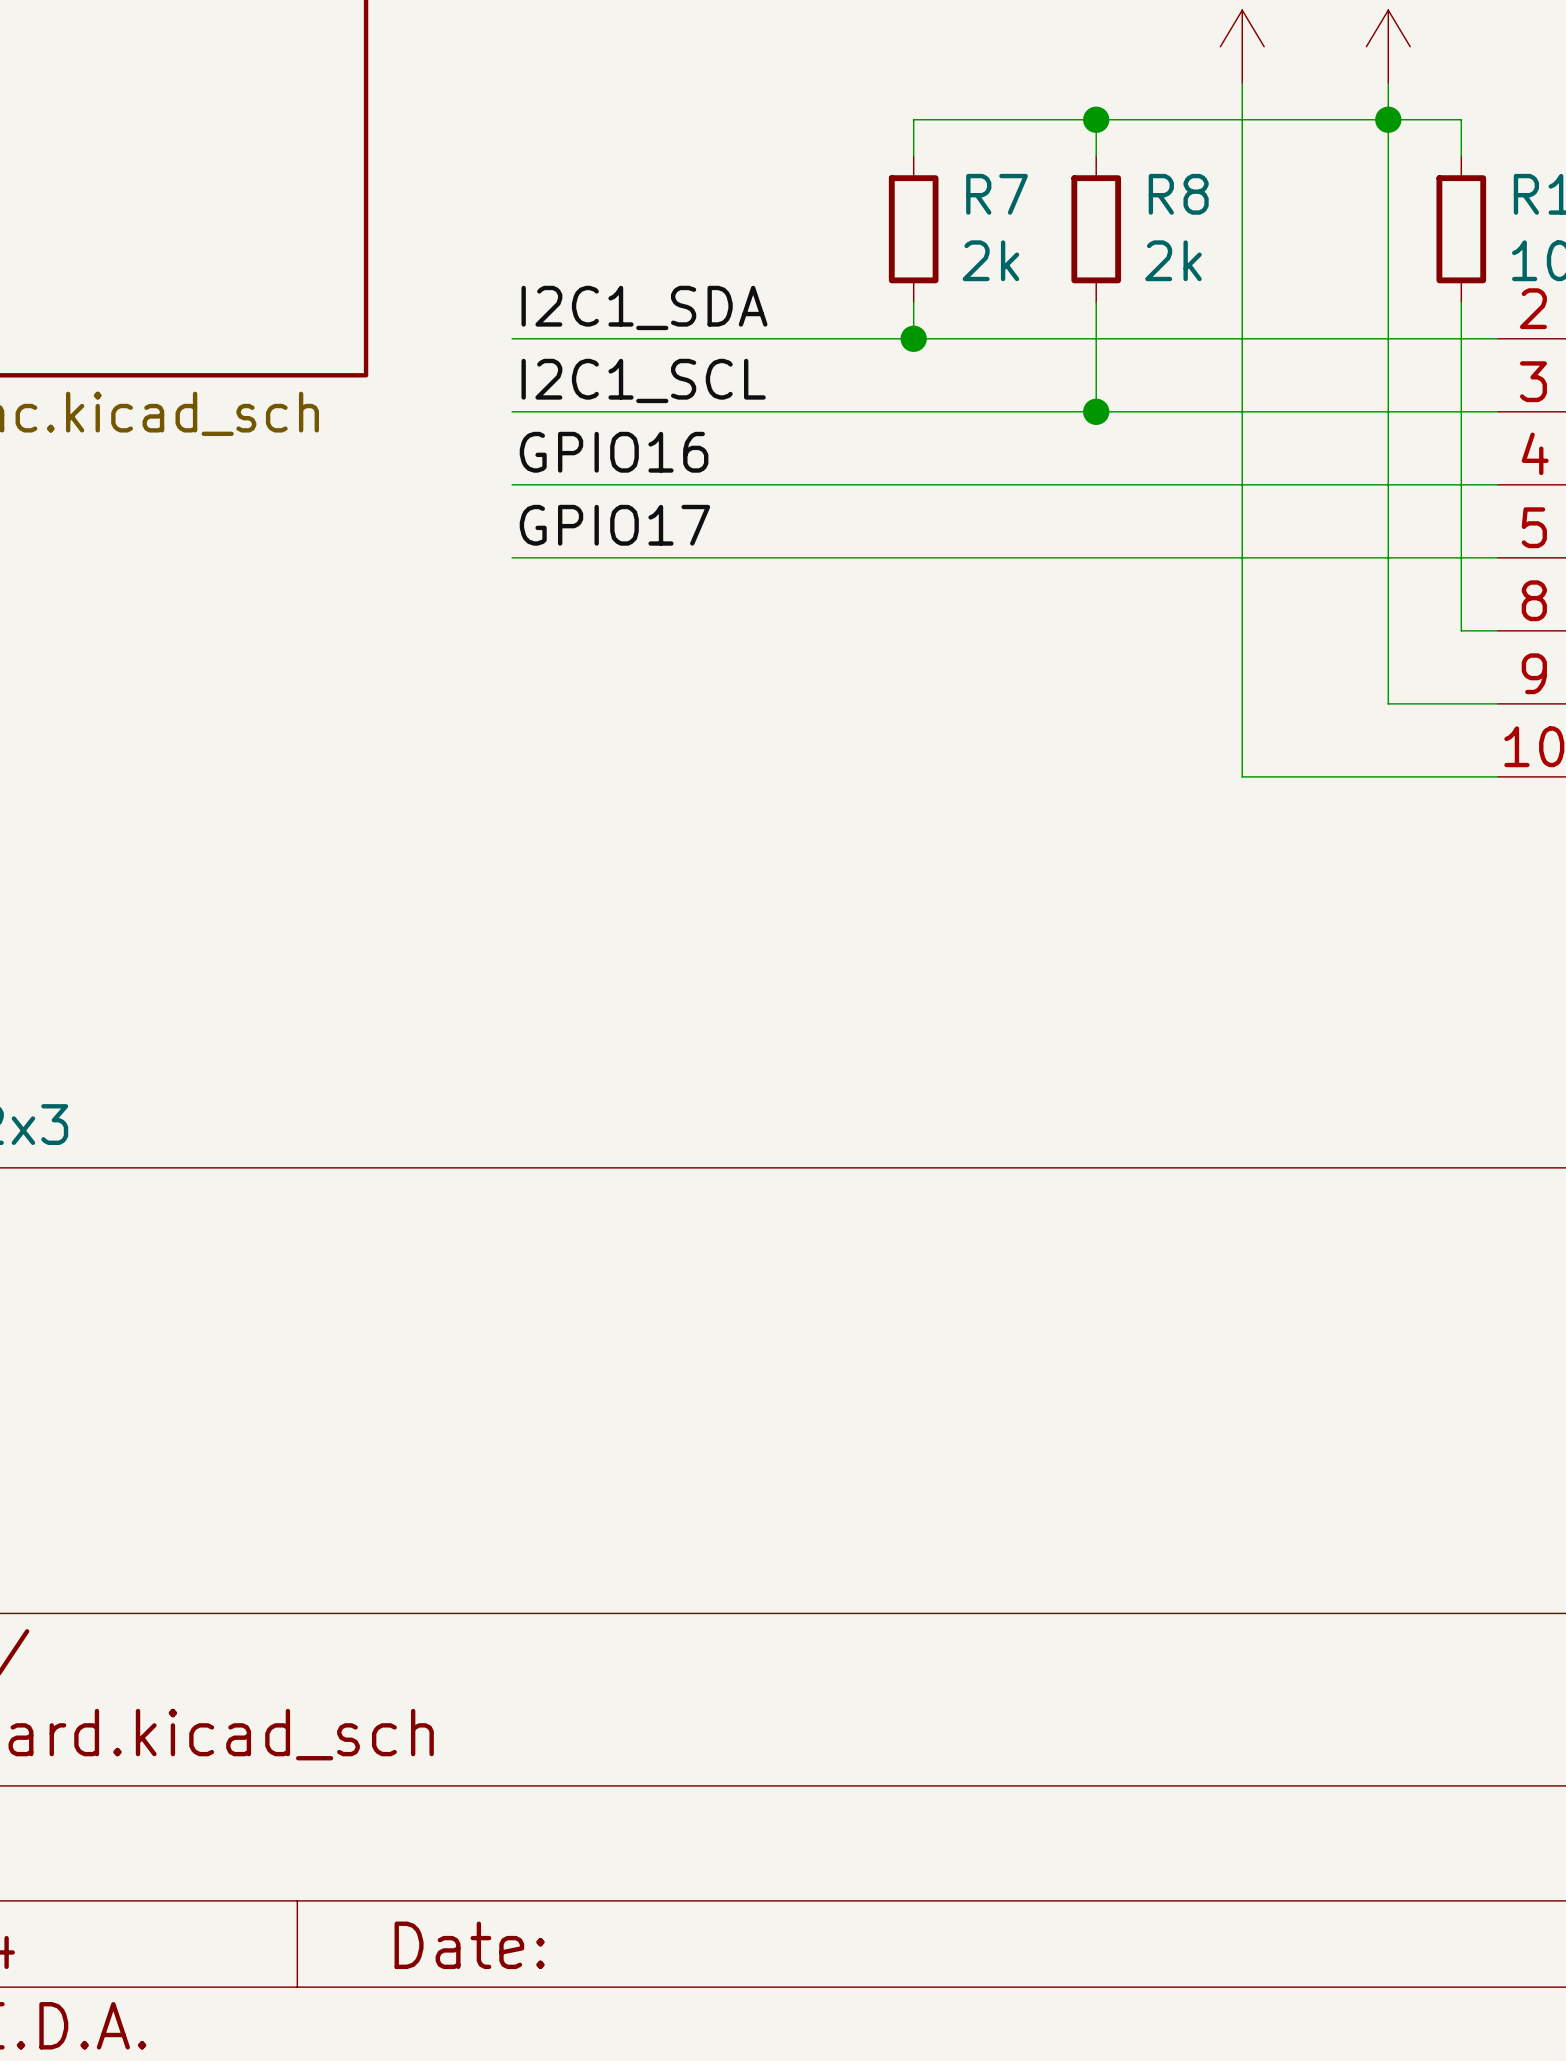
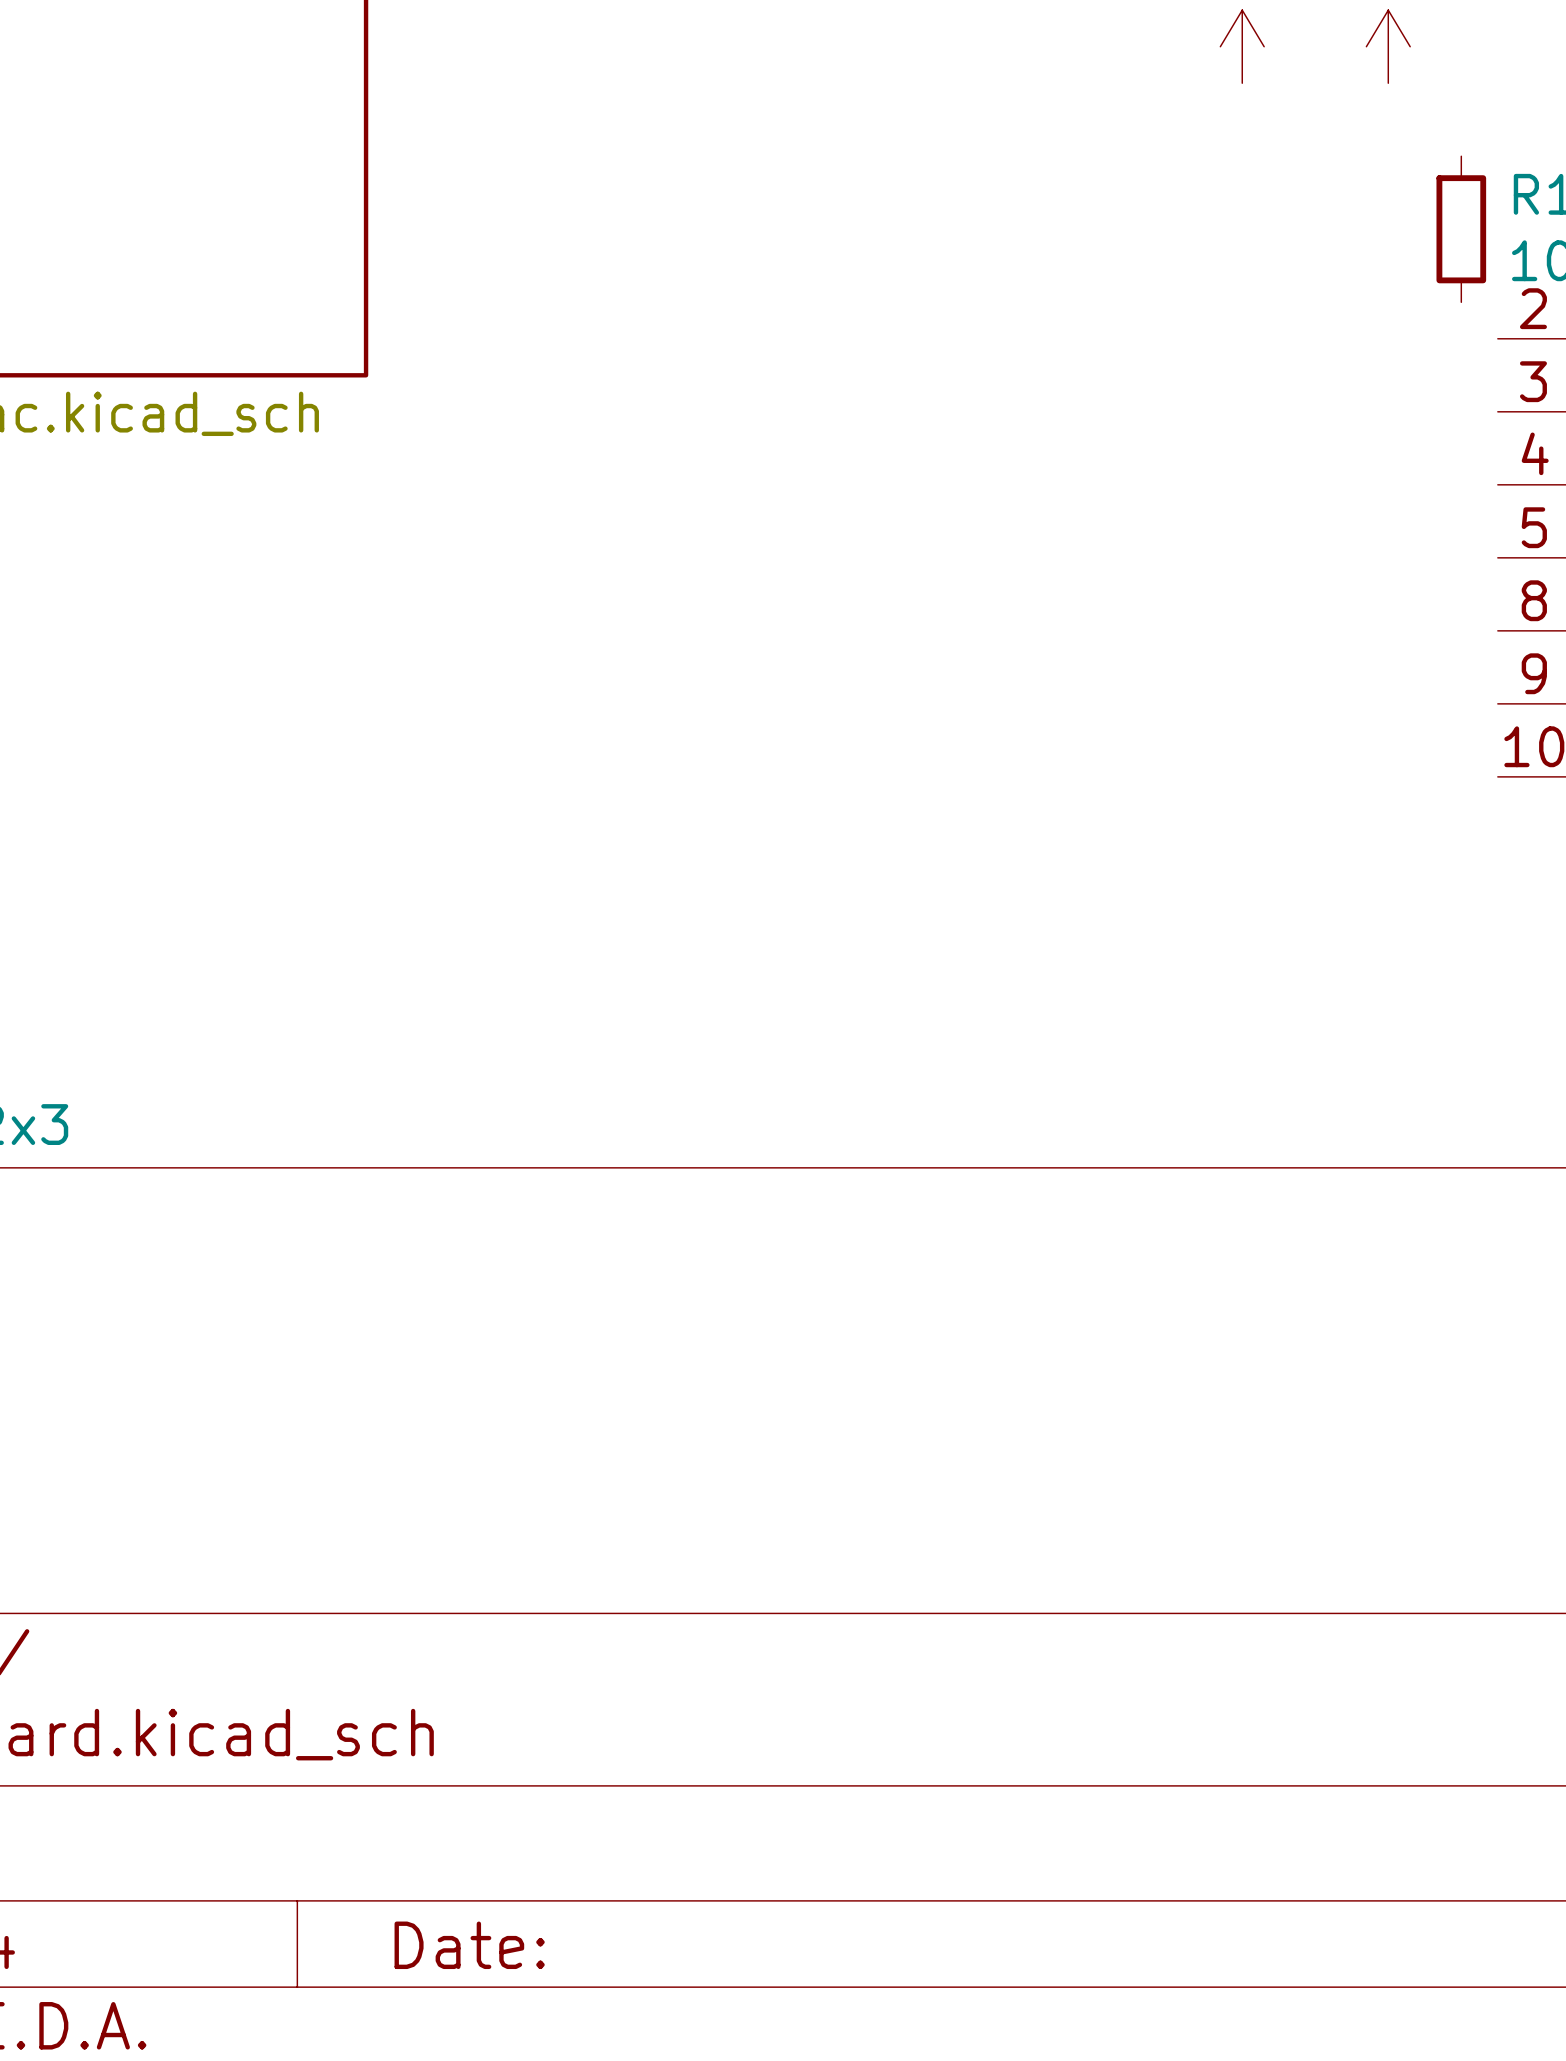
wire: (1242, 83) (1242, 776) (1497, 776) -> none
wire: (1388, 83) (1388, 703) (1497, 703) -> none
wire: (1096, 119) (1096, 156) -> none
junction: (1096, 119) -> none
junction: (1388, 119) -> none
wire: (913, 156) (913, 119) (1461, 119) (1461, 156) -> none
R7: 2k (913, 229) -> none
R8: 2k (1096, 229) -> none
wire: (913, 302) (913, 338) -> none
wire: (1096, 302) (1096, 411) -> none
wire: (1461, 302) (1461, 630) (1497, 630) -> none
label: I2C1_SDA (644, 307) -> none
wire: (512, 338) (1497, 338) -> none
junction: (913, 338) -> none
label: I2C1_SCL (643, 380) -> none
wire: (512, 411) (1497, 411) -> none
junction: (1096, 411) -> none
label: GPIO16 (614, 452) -> none
wire: (512, 484) (1497, 484) -> none
label: GPIO17 (614, 525) -> none
wire: (512, 557) (1497, 557) -> none

